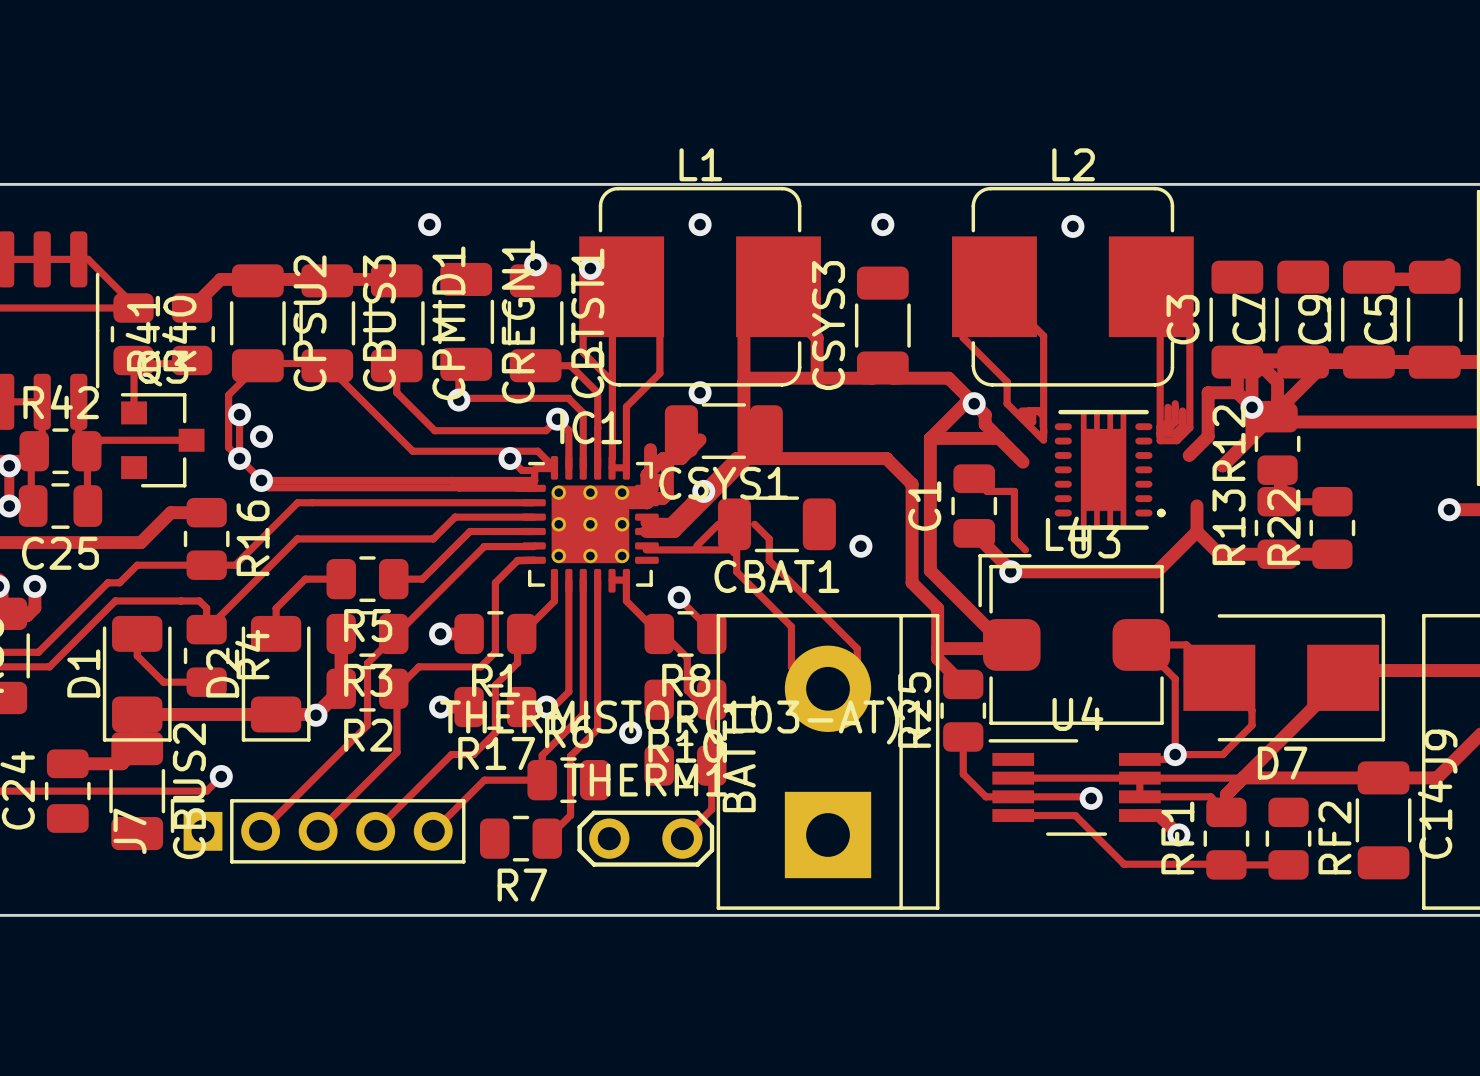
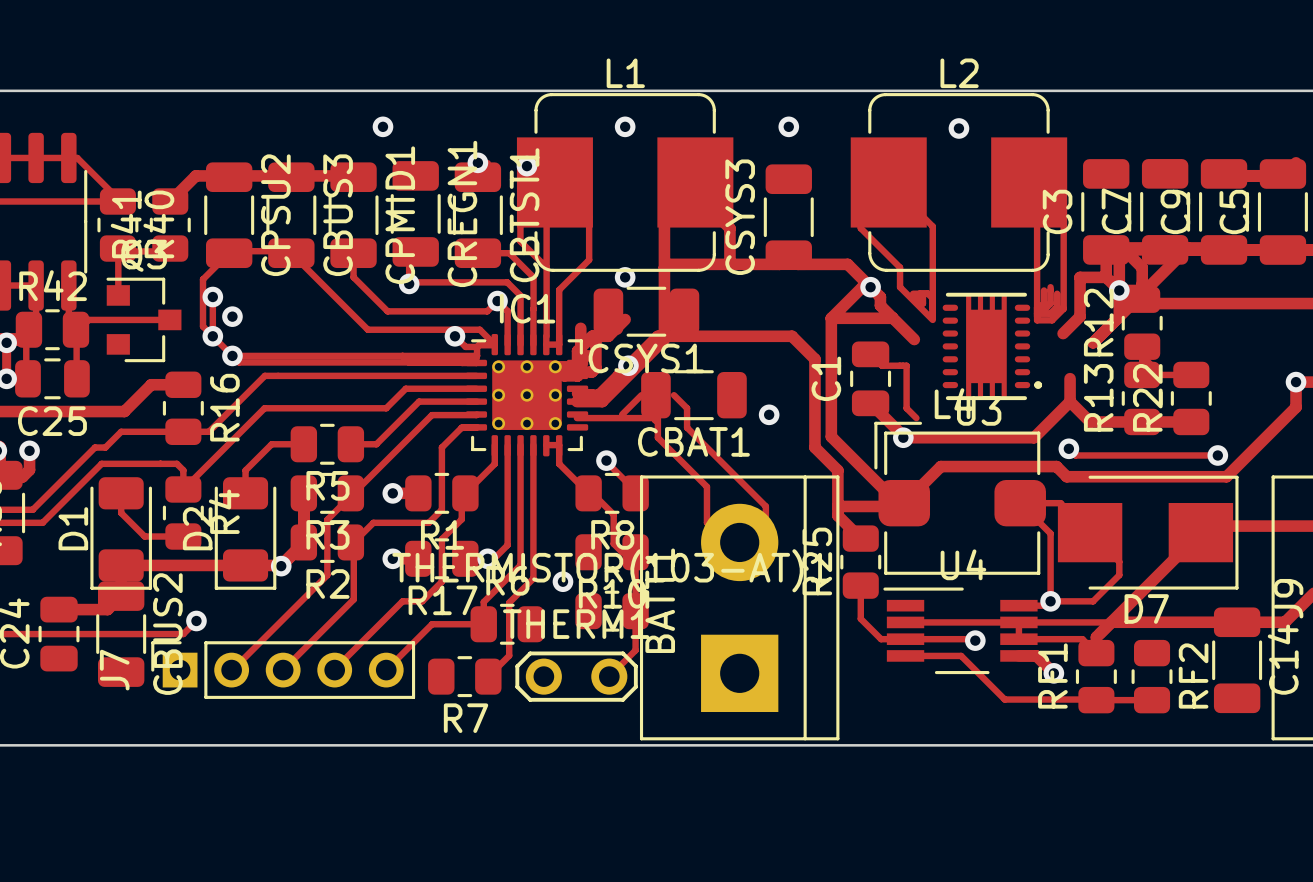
track: none -> (1296, 382) (1296, 407) (1226, 476) (1066, 476) (1056, 466) (940, 466) (904, 503)
track: none -> (1068, 448) (1075, 455) (1217, 455)
via: none -> (1068, 448)
via: none -> (1217, 455)

